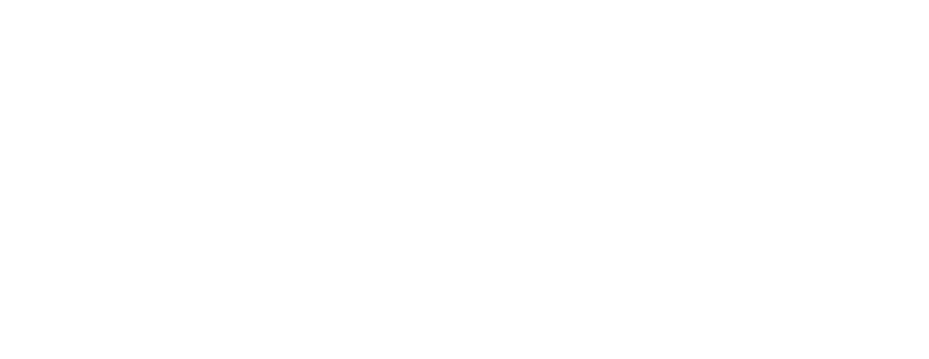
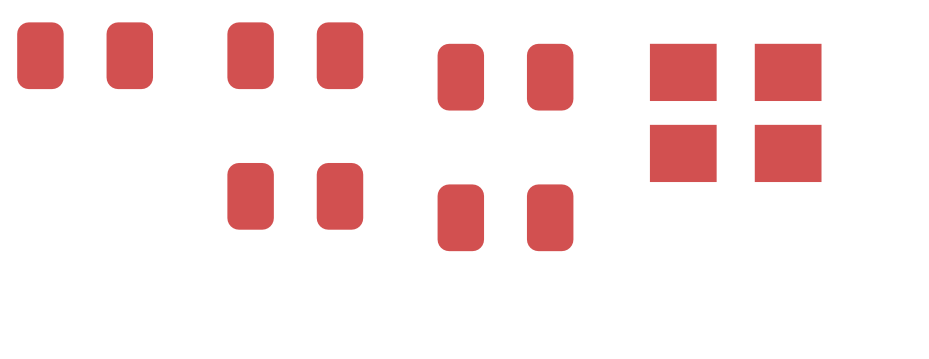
part: none -> (85, 55)
part: none -> (295, 55)
part: none -> (505, 77)
part: none -> (735, 112)
part: none -> (295, 196)
part: none -> (505, 217)

